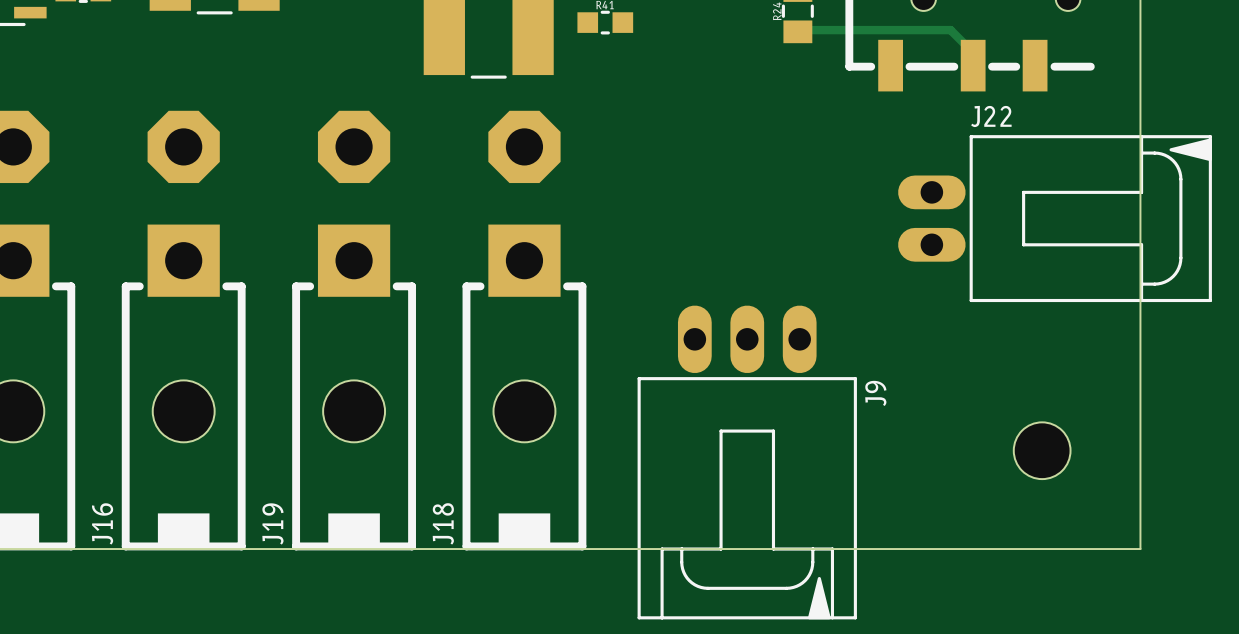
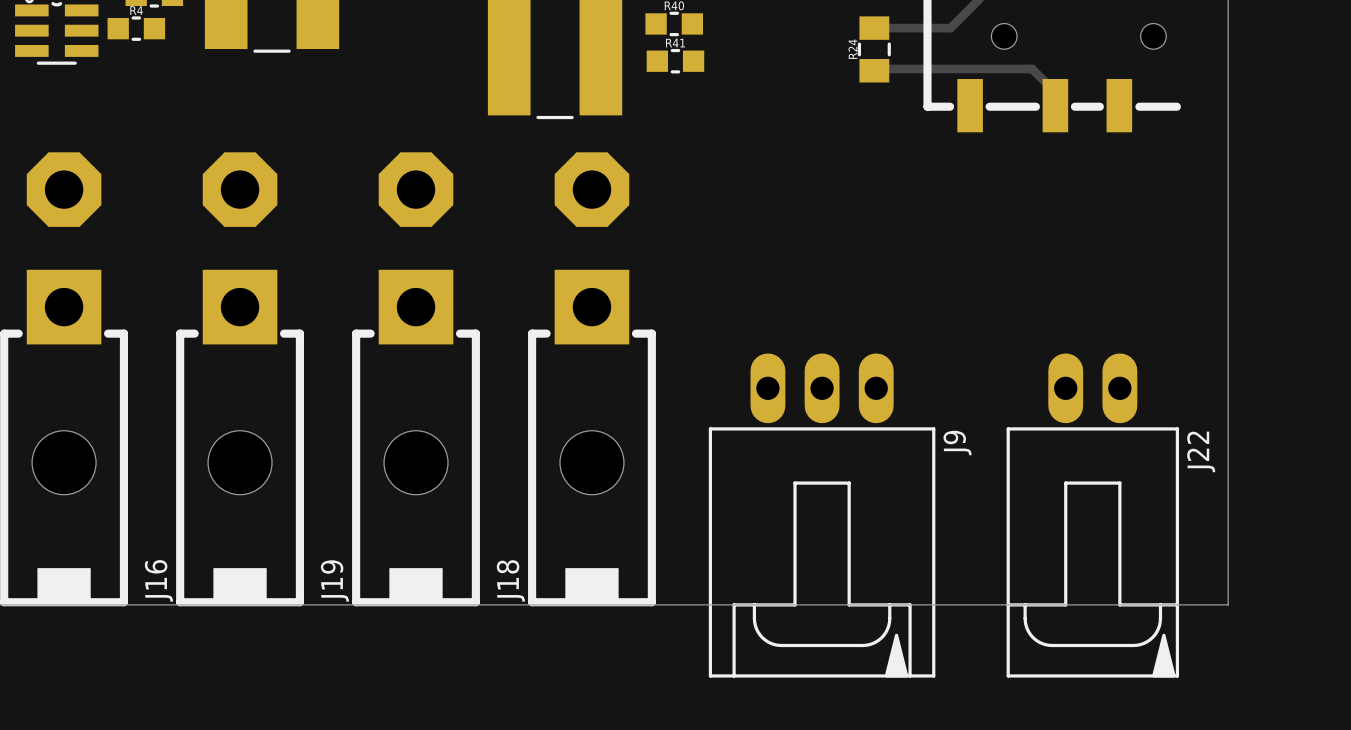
J22 rotation: 0° (1055, 218) -> 90° clockwise (1092, 515)
J22 position: (1055, 218) -> (1092, 515)
part: (1042, 450) -> none

